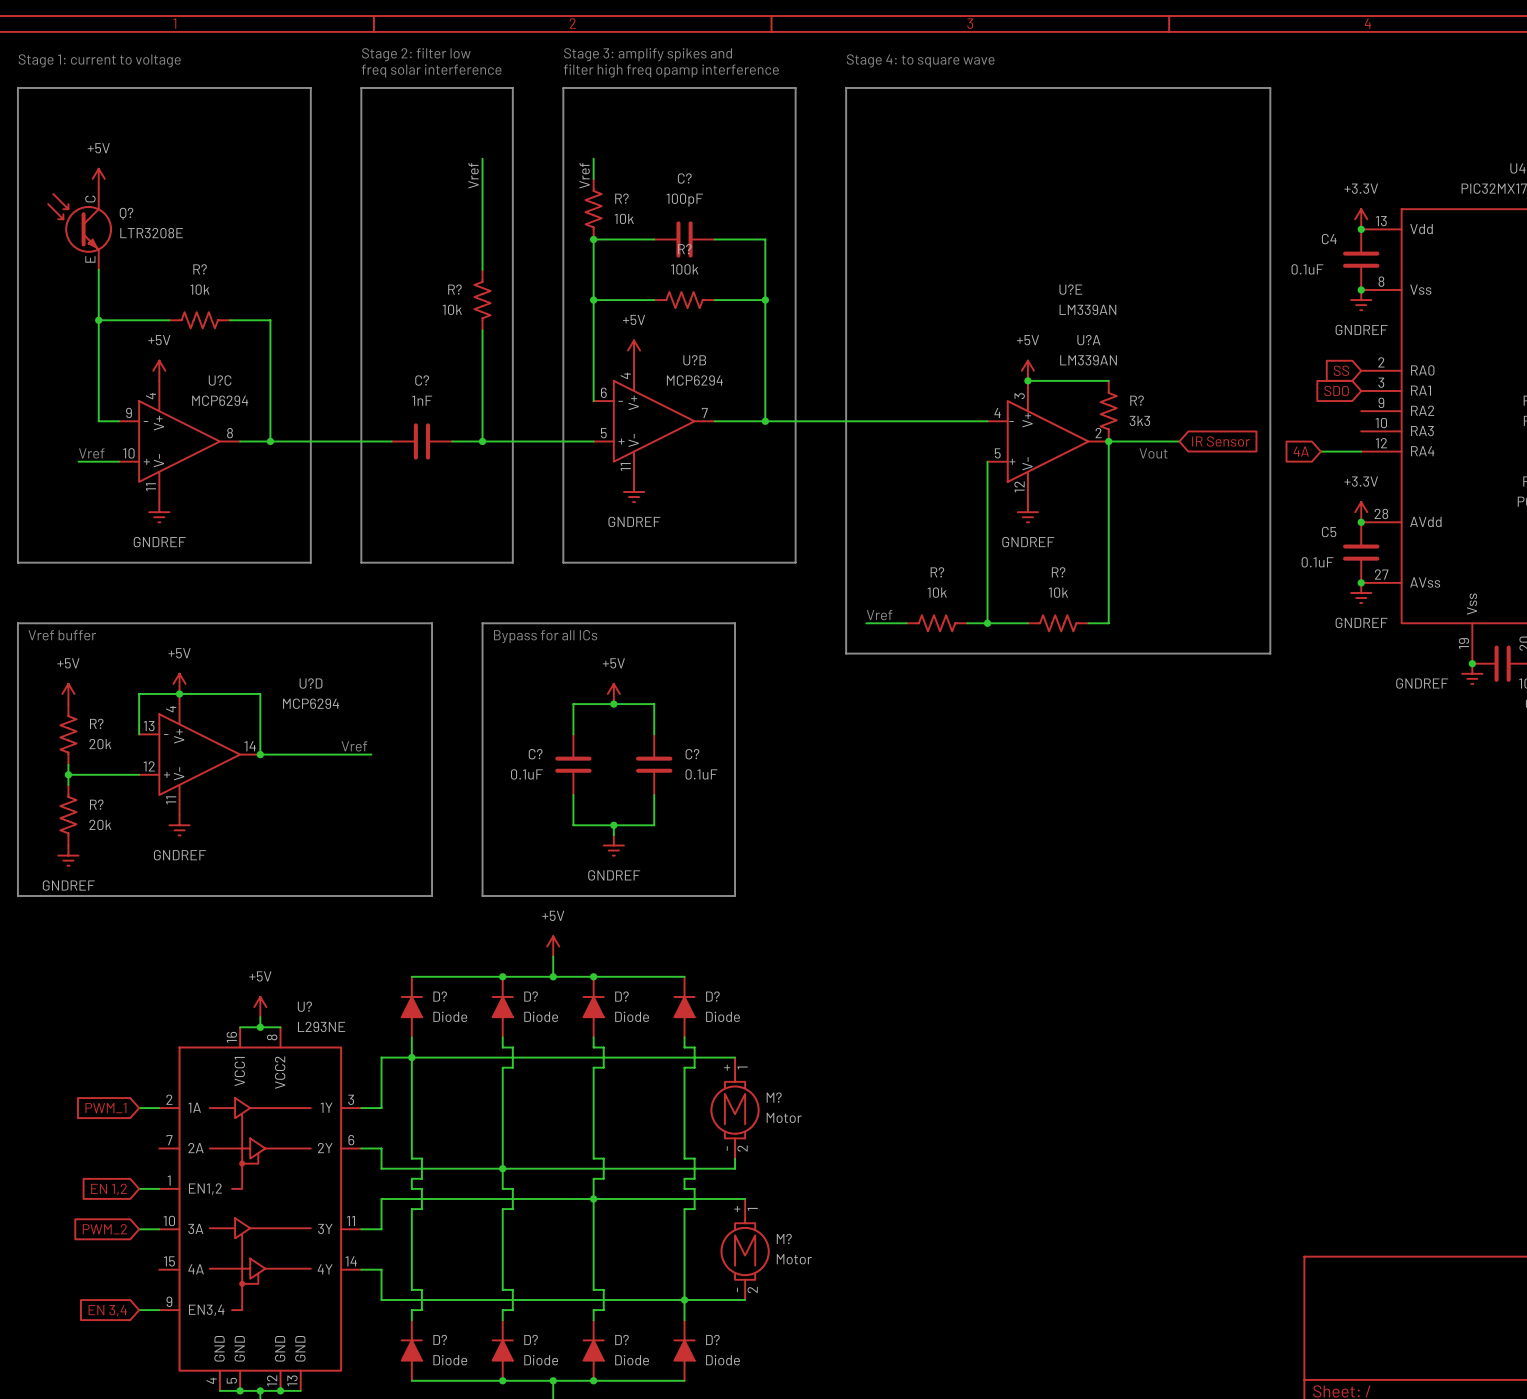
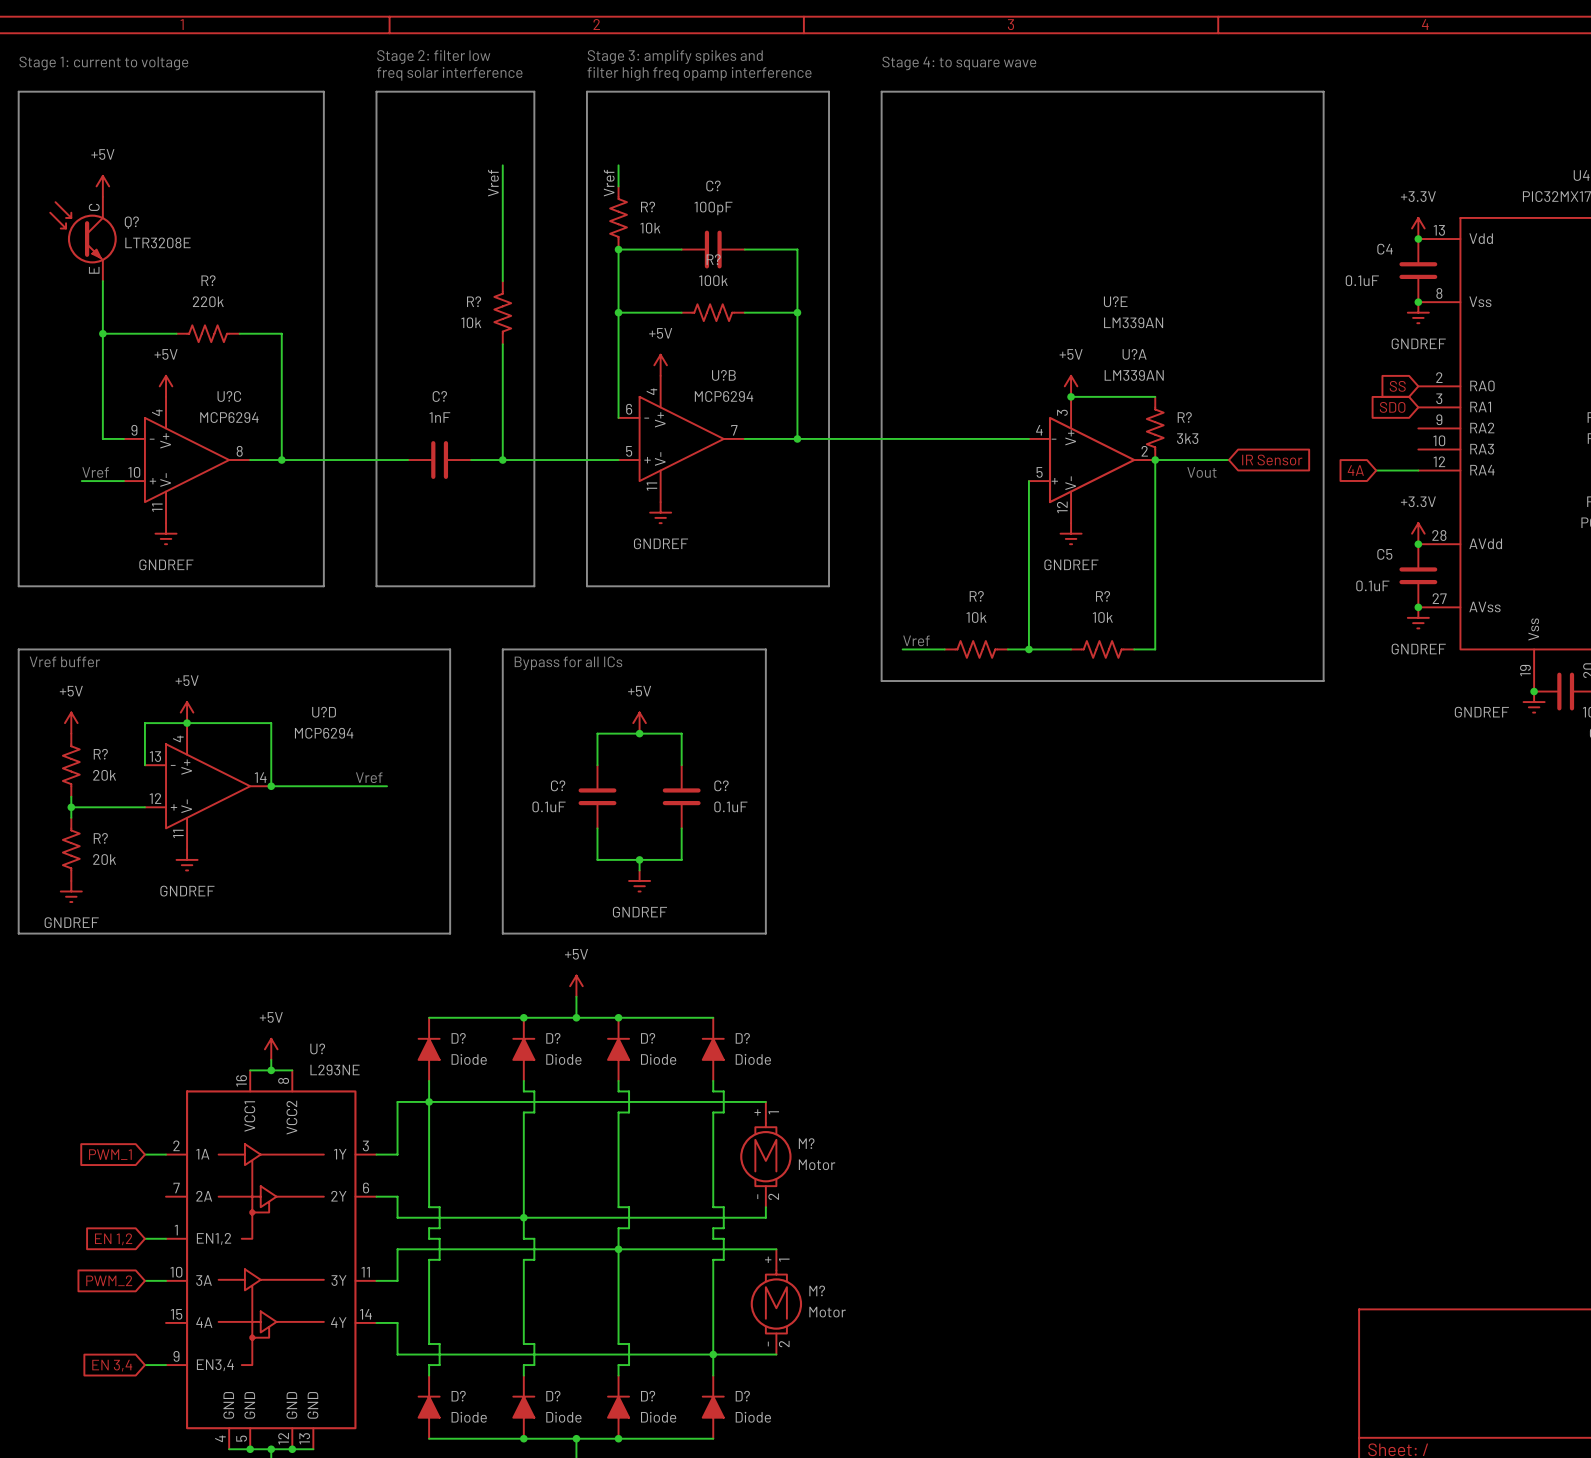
R? value: 10k (199, 289) -> 220k (208, 301)

